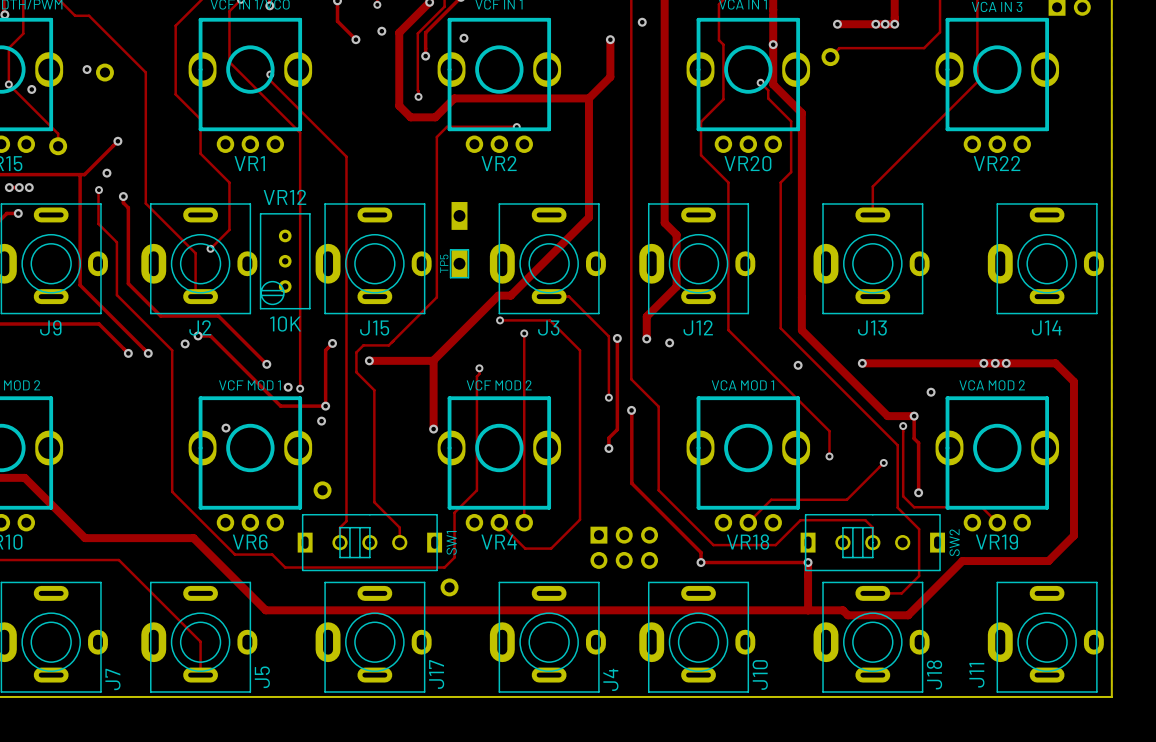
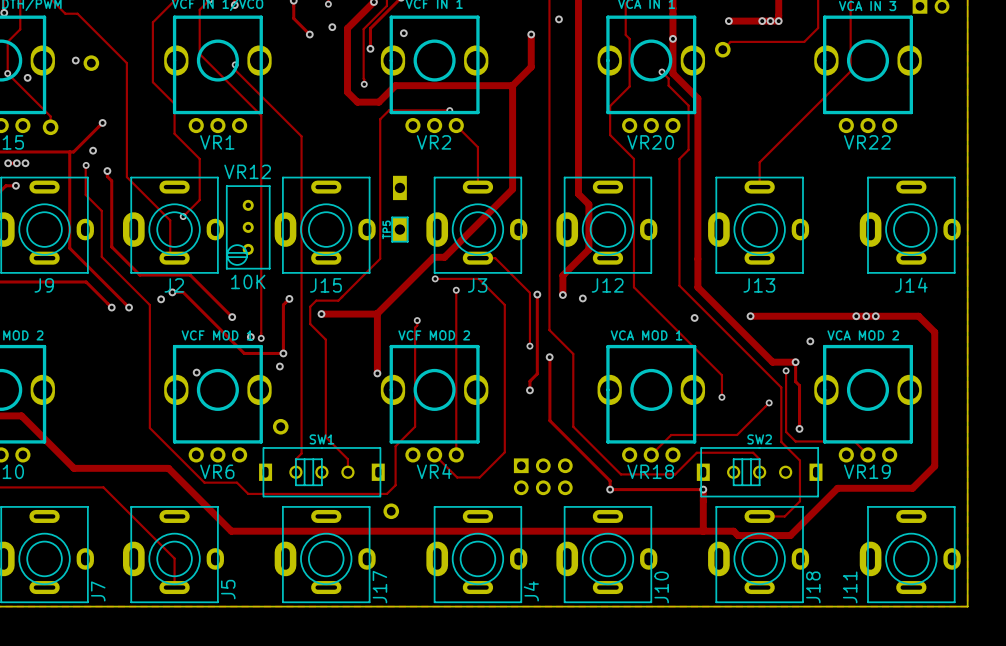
track: none -> (456, 125) (477, 147) (477, 187)
SW1 name rotation: 0° (451, 542) -> 90° clockwise (321, 439)
SW1 name position: SW1 (451, 542) -> SW1 (321, 439)
SW2 name rotation: 0° (954, 542) -> 90° clockwise (759, 439)
SW2 name position: SW2 (954, 542) -> SW2 (759, 439)

